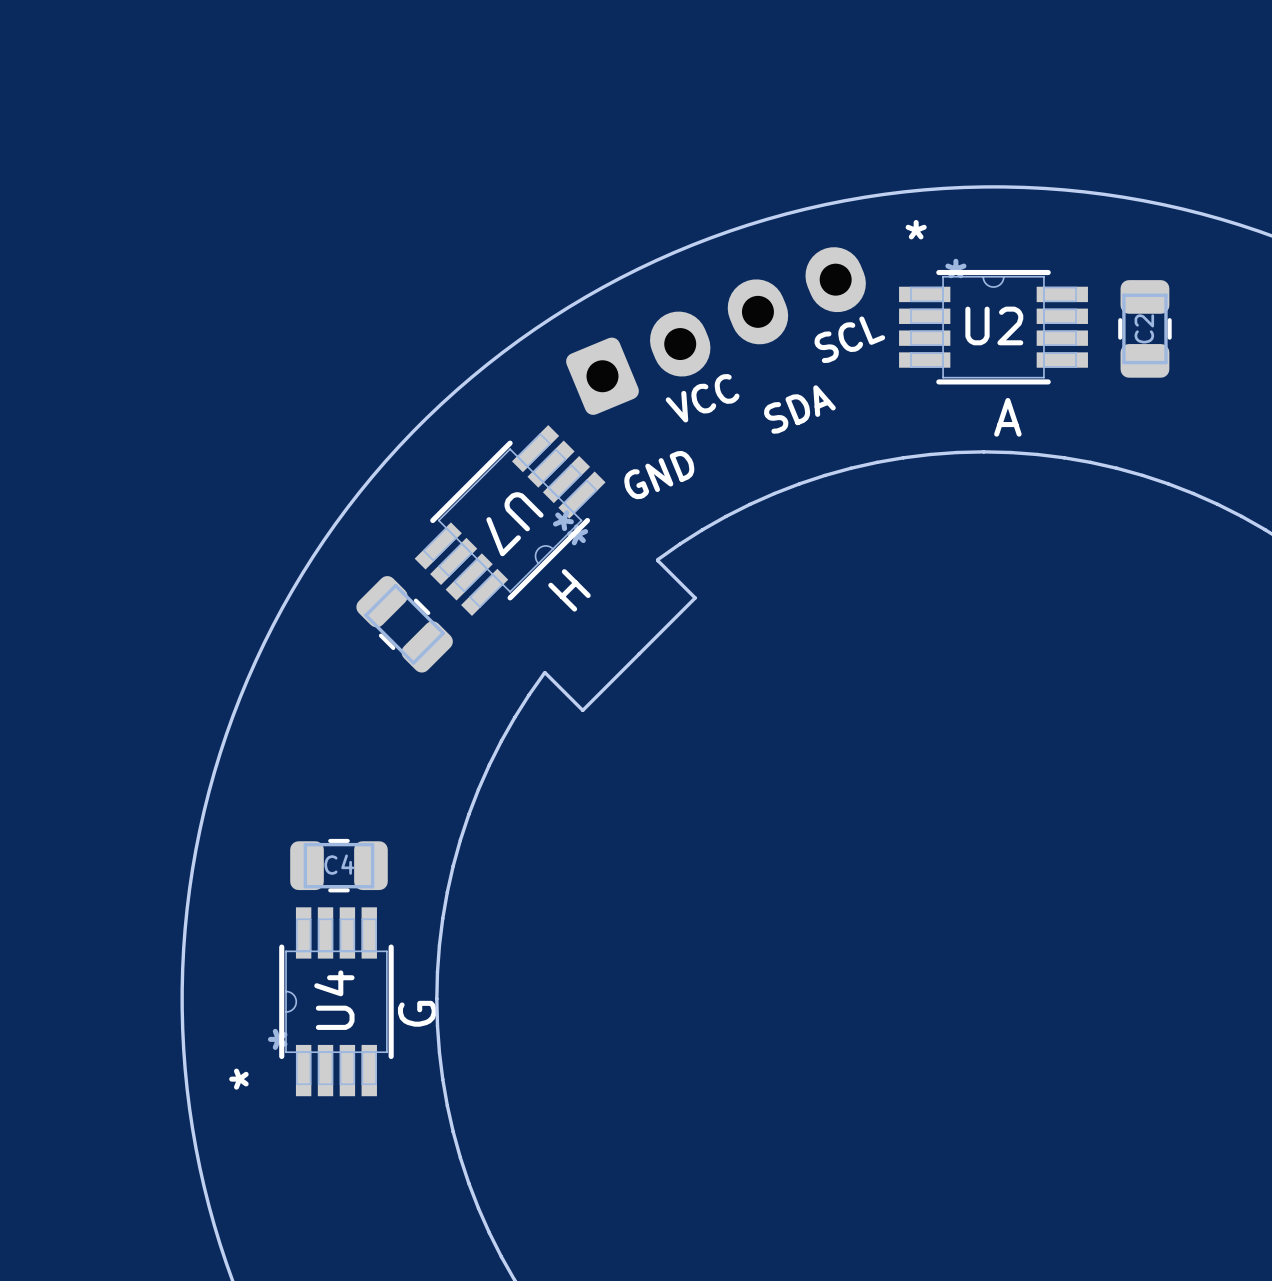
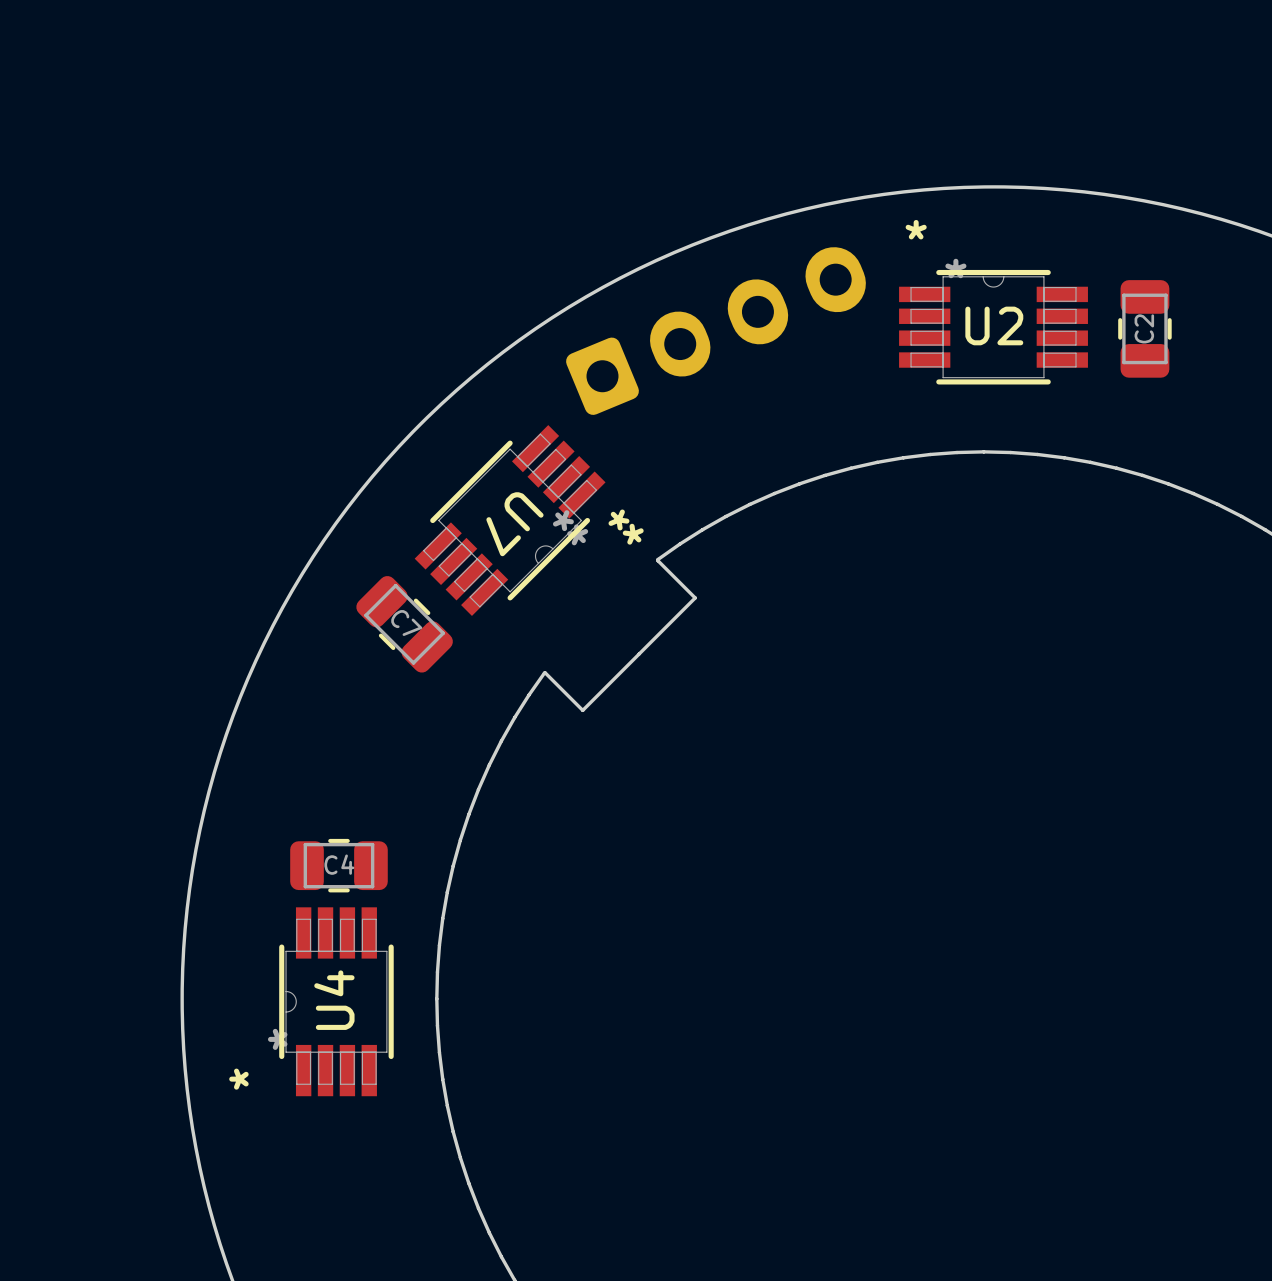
text: SCL (849, 339) -> none
text: VCC (702, 398) -> none
text: SDA (799, 409) -> none
text: A (1007, 417) -> none
U7 footprint: [414, 425, 606, 616] -> [414, 425, 606, 616]
text: GND (659, 475) -> none
text: H (569, 590) -> none
C7 name: none -> C7 (406, 623)
text: G (417, 1013) -> none

